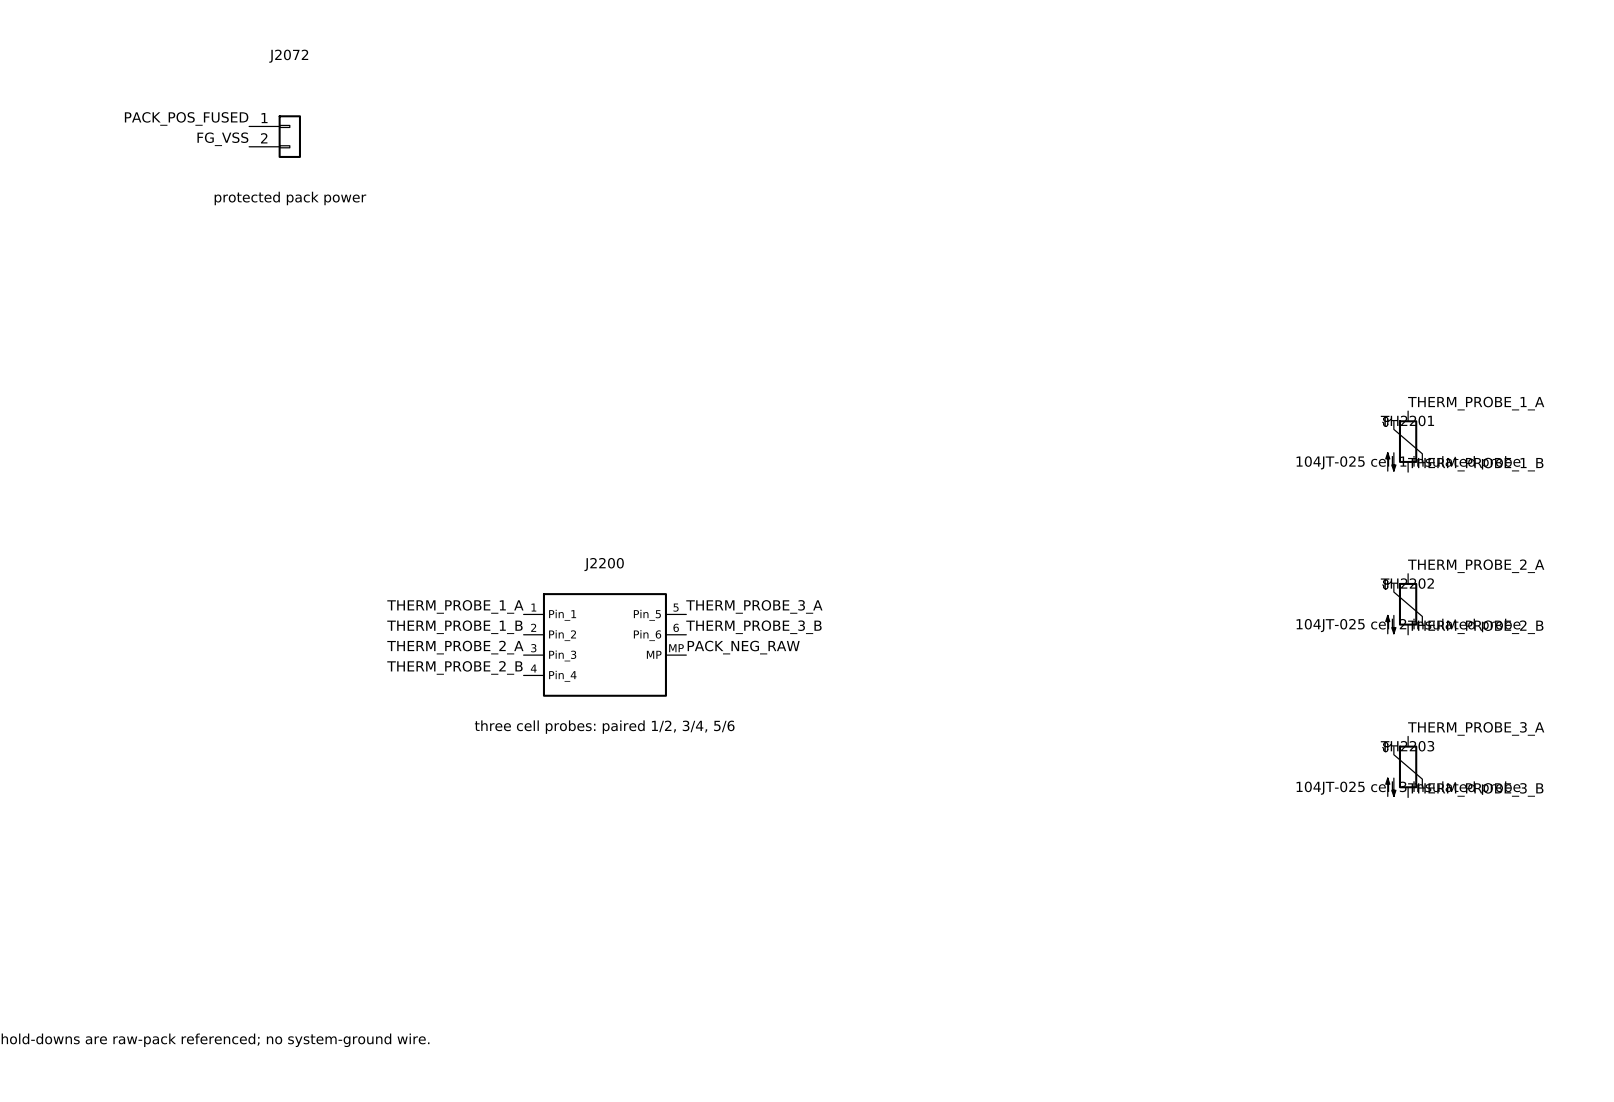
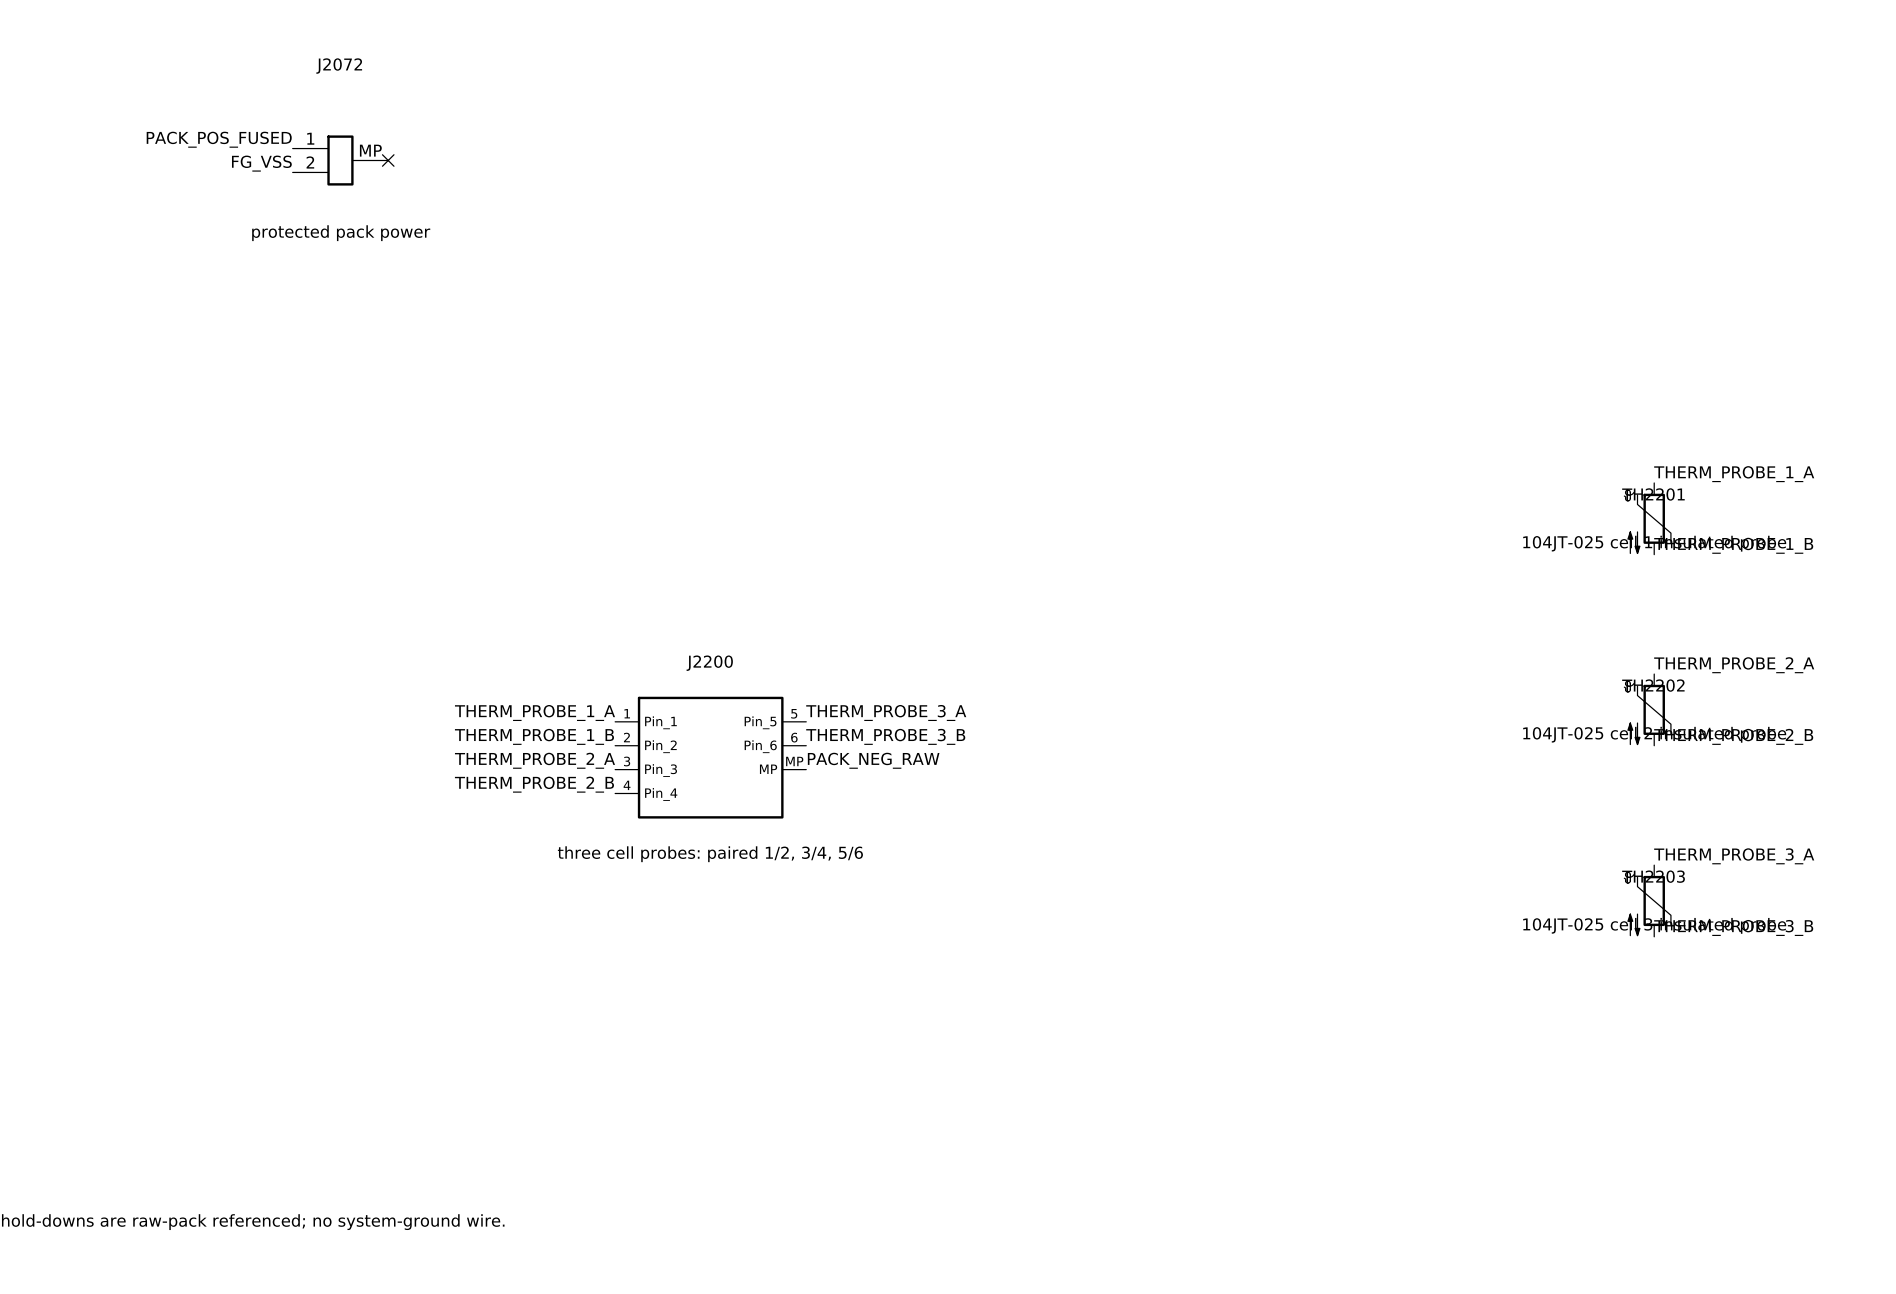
J2072 symbol: [249, 115, 301, 158] -> [292, 135, 389, 186]
no-connect mark: none -> (388, 160)

